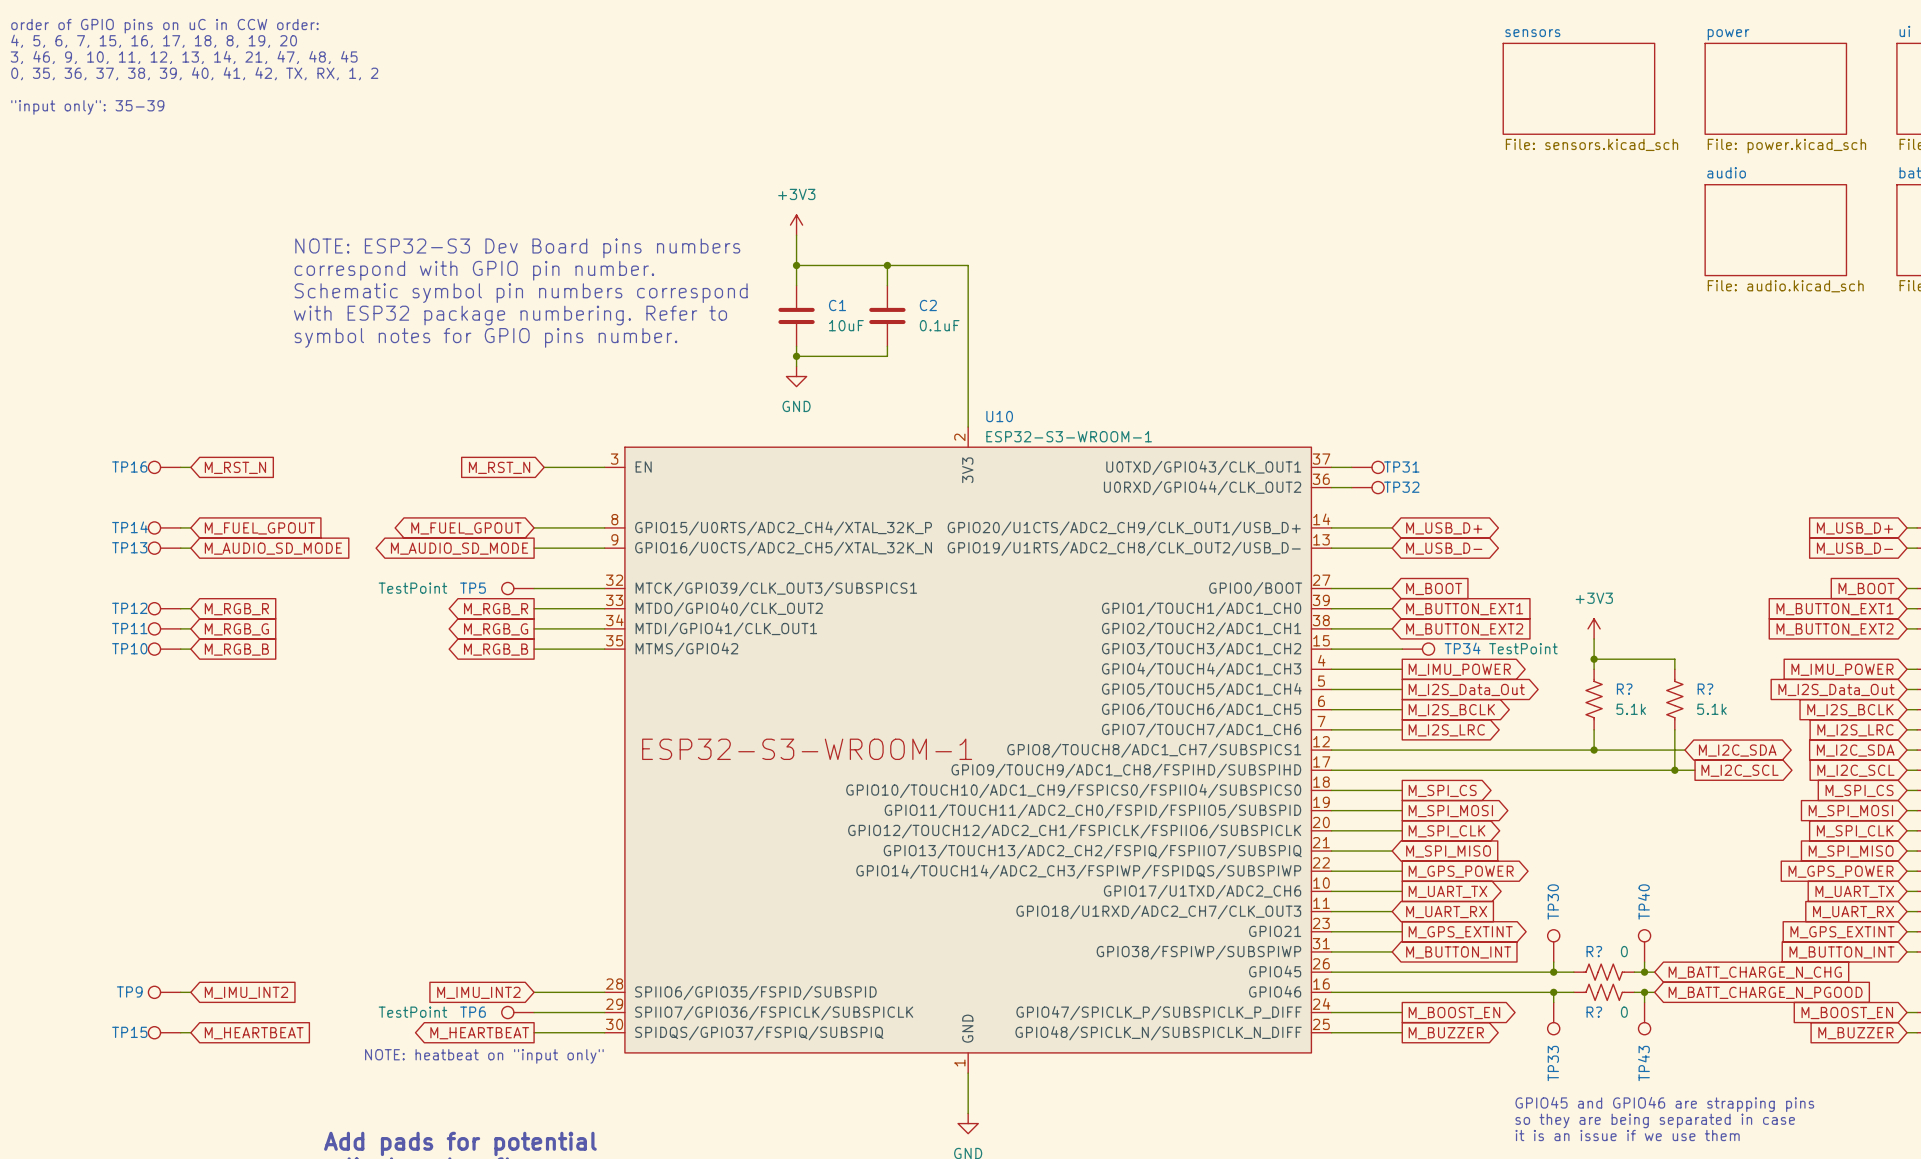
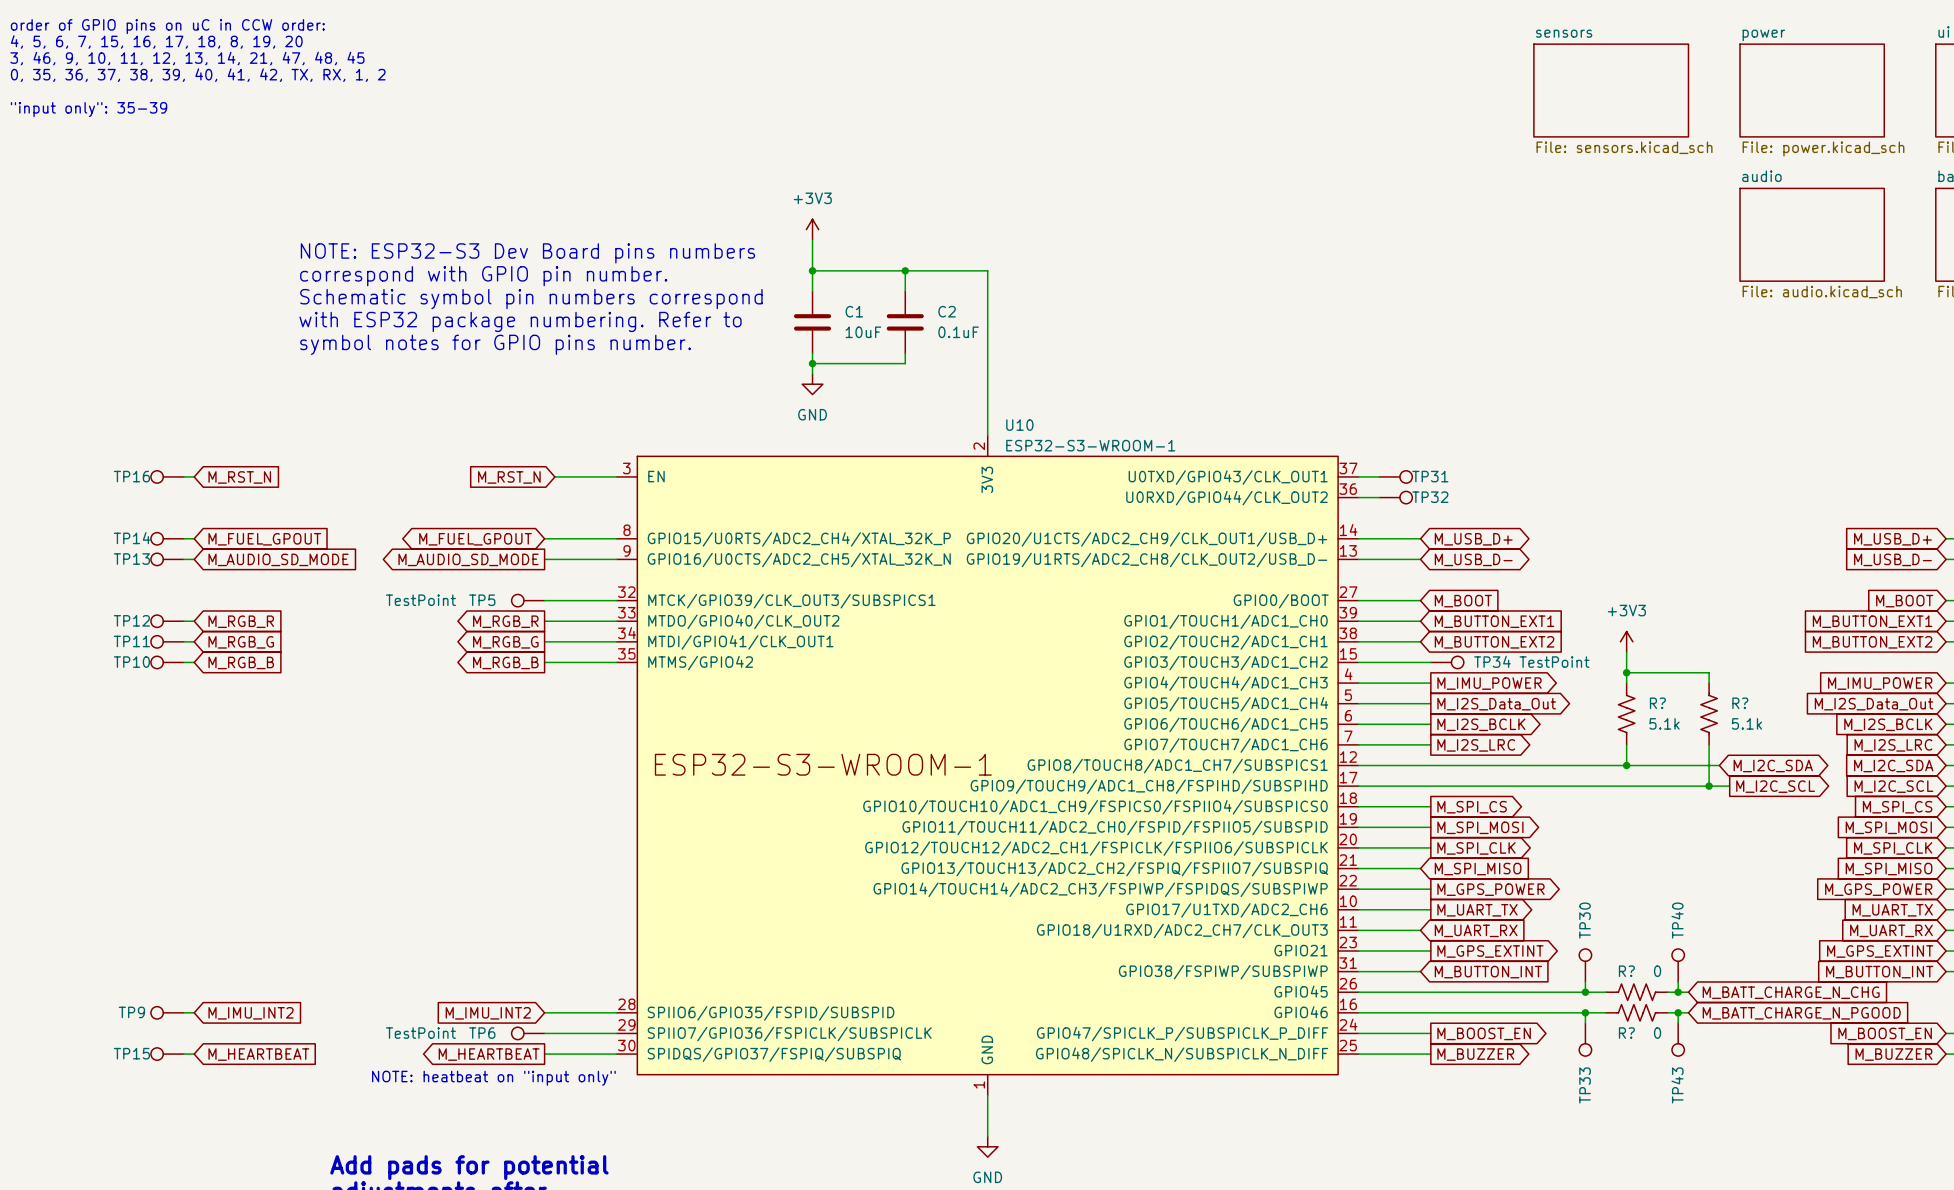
text: GPIO45 and GPIO46 are strapping pins (1664, 1104) -> none
text: so they are being separated in case (1655, 1120) -> none
text: it is an issue if we use them (1627, 1135) -> none

